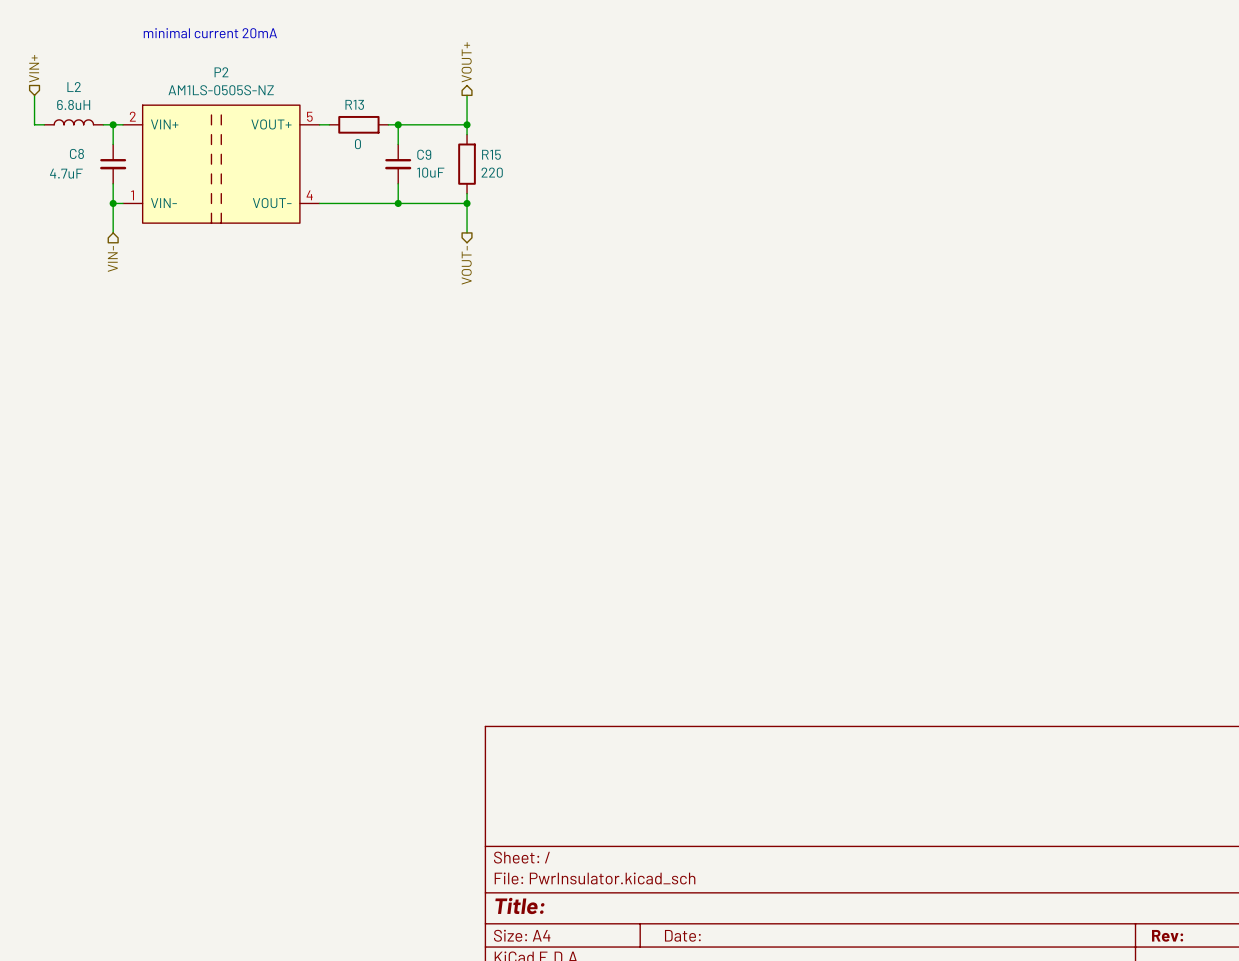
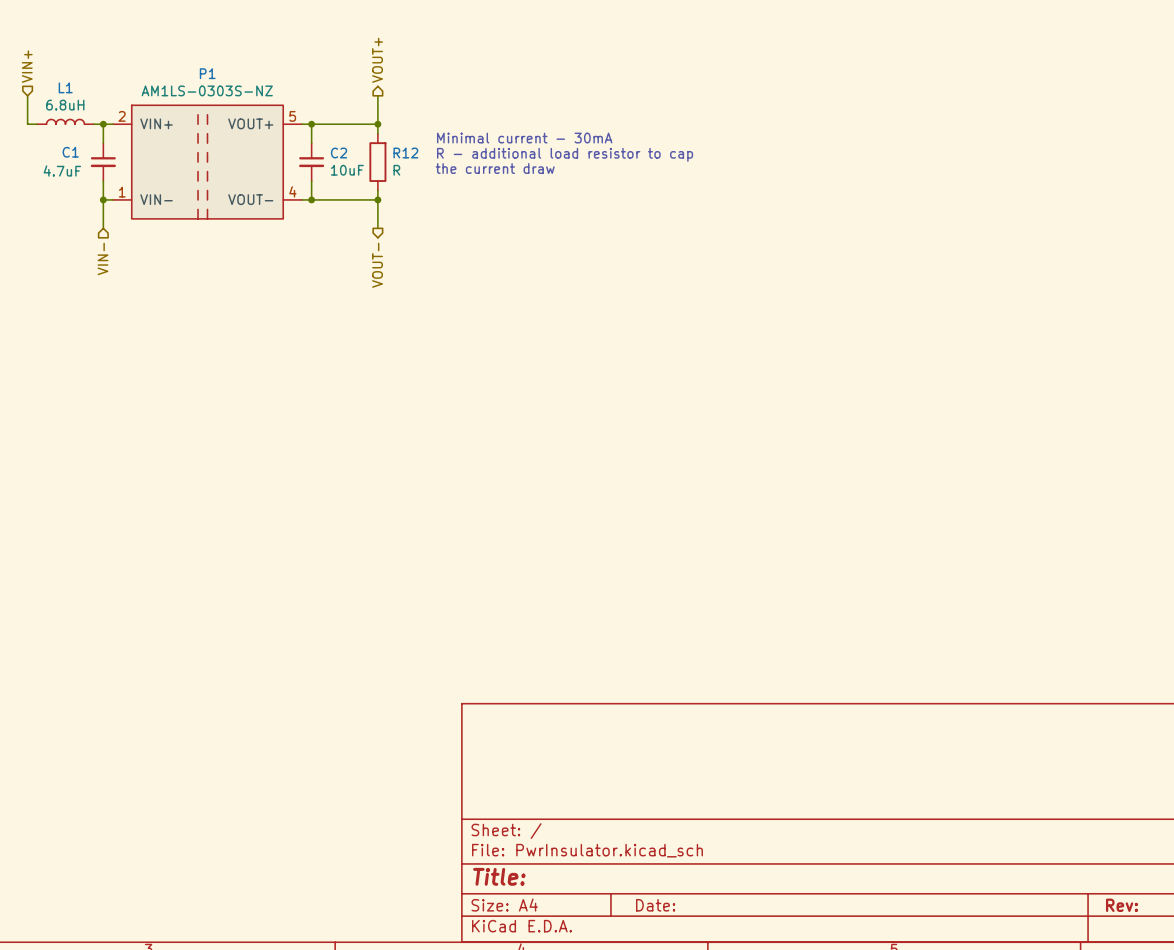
text: minimal current 20mA (210, 33) -> none
hierarchical label position: VOUT+ (466, 62) -> VOUT+ (377, 60)
P2 name: P2 (221, 72) -> P1 (207, 73)
L2 name: L2 (74, 87) -> L1 (65, 87)
P2 value: AM1LS-0505S-NZ (221, 90) -> AM1LS-0303S-NZ (207, 90)
wire: (467, 95) (467, 134) -> none
junction: none -> (311, 124)
R13: 0 (358, 124) -> none
wire: none -> (368, 124) (311, 124) (311, 143)
wire: (398, 124) (467, 124) -> (377, 124) (377, 95)
junction: (467, 124) -> none
text: none -> Minimal current - 30mA (524, 138)
C8 name: C8 (76, 153) -> C1 (70, 152)
text: none -> R - additional load resistor to cap (565, 154)
C2: none -> 10uF (311, 162)
C9: 10uF (398, 164) -> none
R12: none -> R (377, 162)
R15: 220 (467, 164) -> none
text: none -> the current draw (495, 168)
wire: none -> (311, 181) (311, 199)
wire: (467, 193) (467, 232) -> none
junction: none -> (311, 199)
wire: (398, 203) (467, 203) -> (377, 199) (377, 228)
junction: (467, 203) -> none
hierarchical label position: VOUT- (466, 265) -> VOUT- (377, 265)

